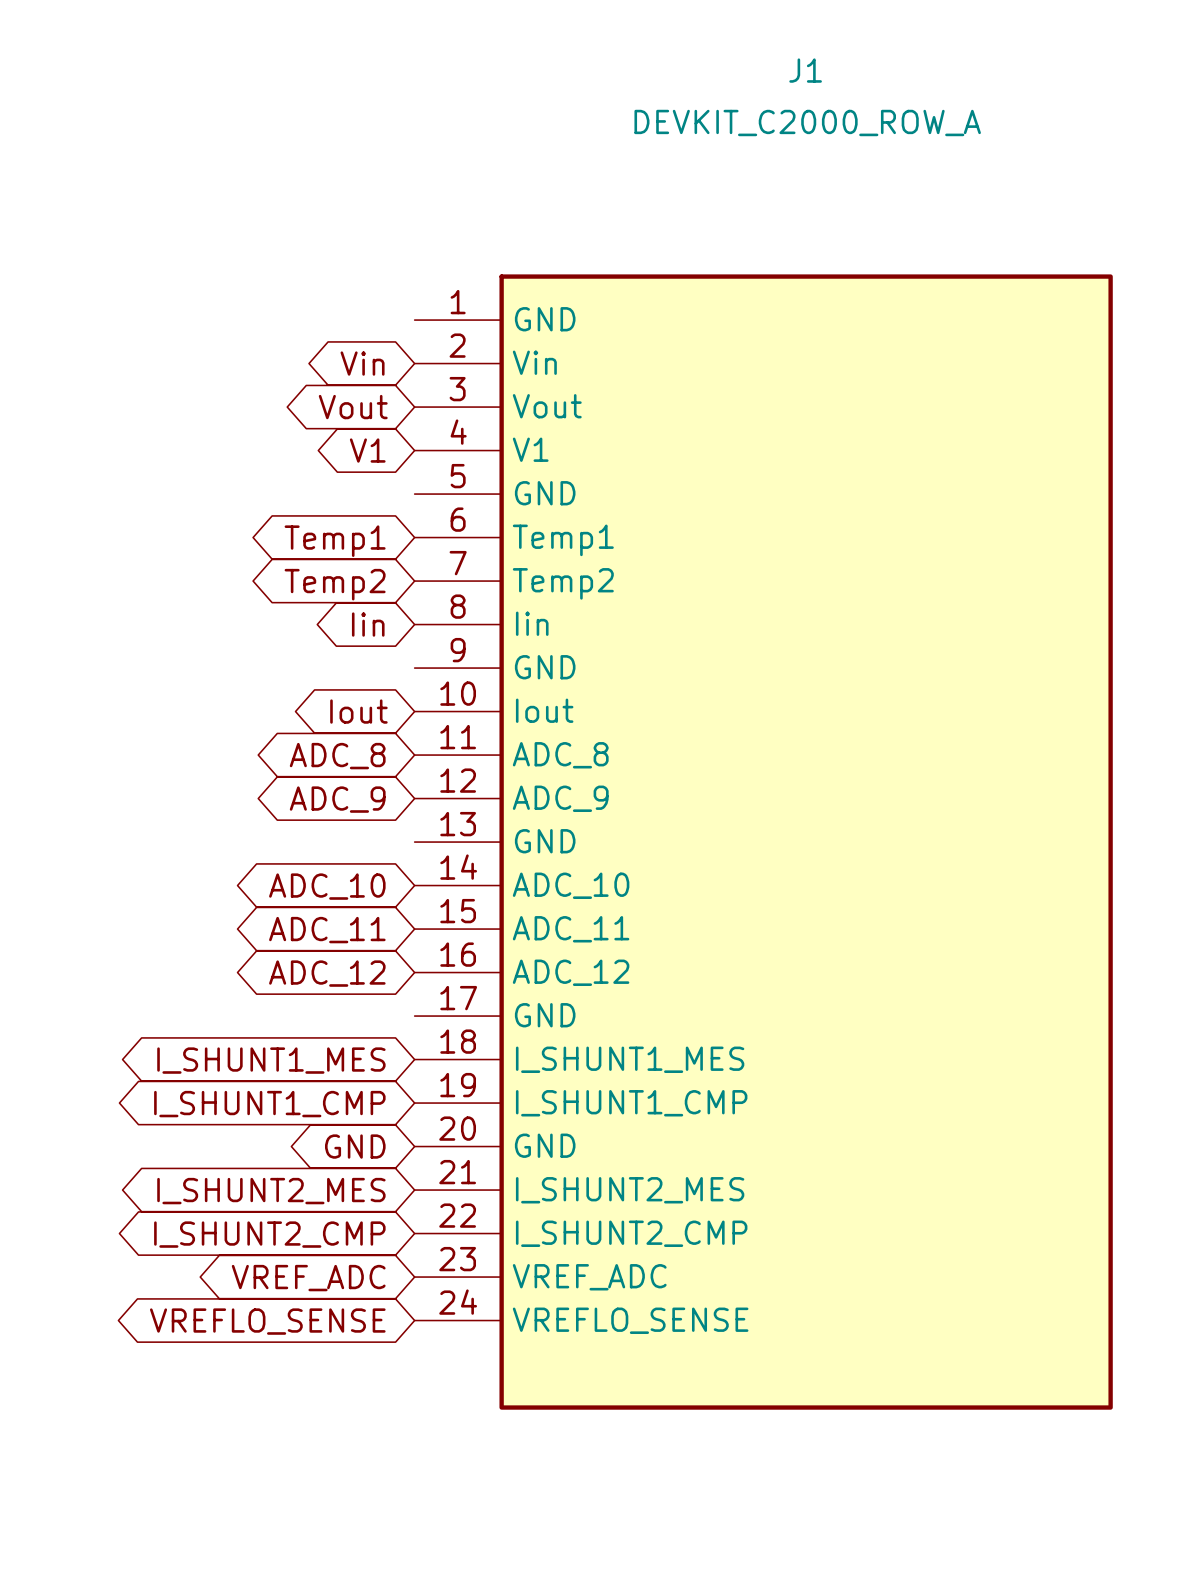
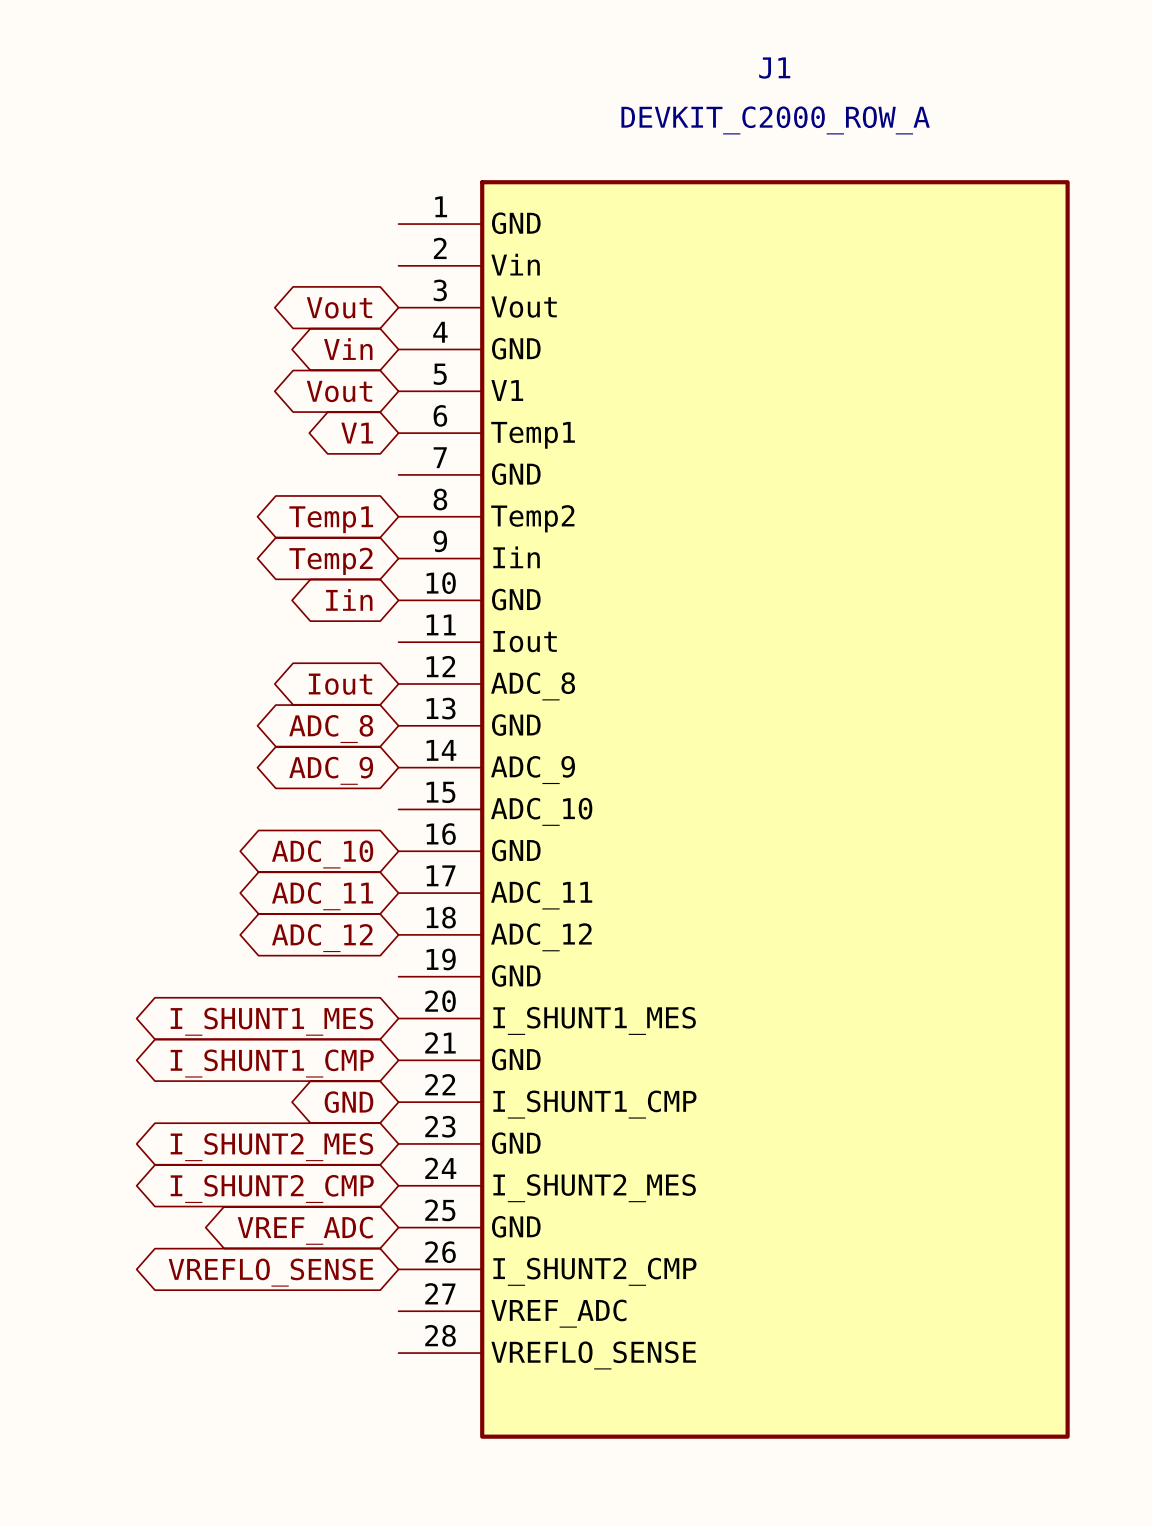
J1 symbol: [414, 274, 1113, 1410] -> [398, 180, 1070, 1439]
global label: none -> Vout (339, 307)

